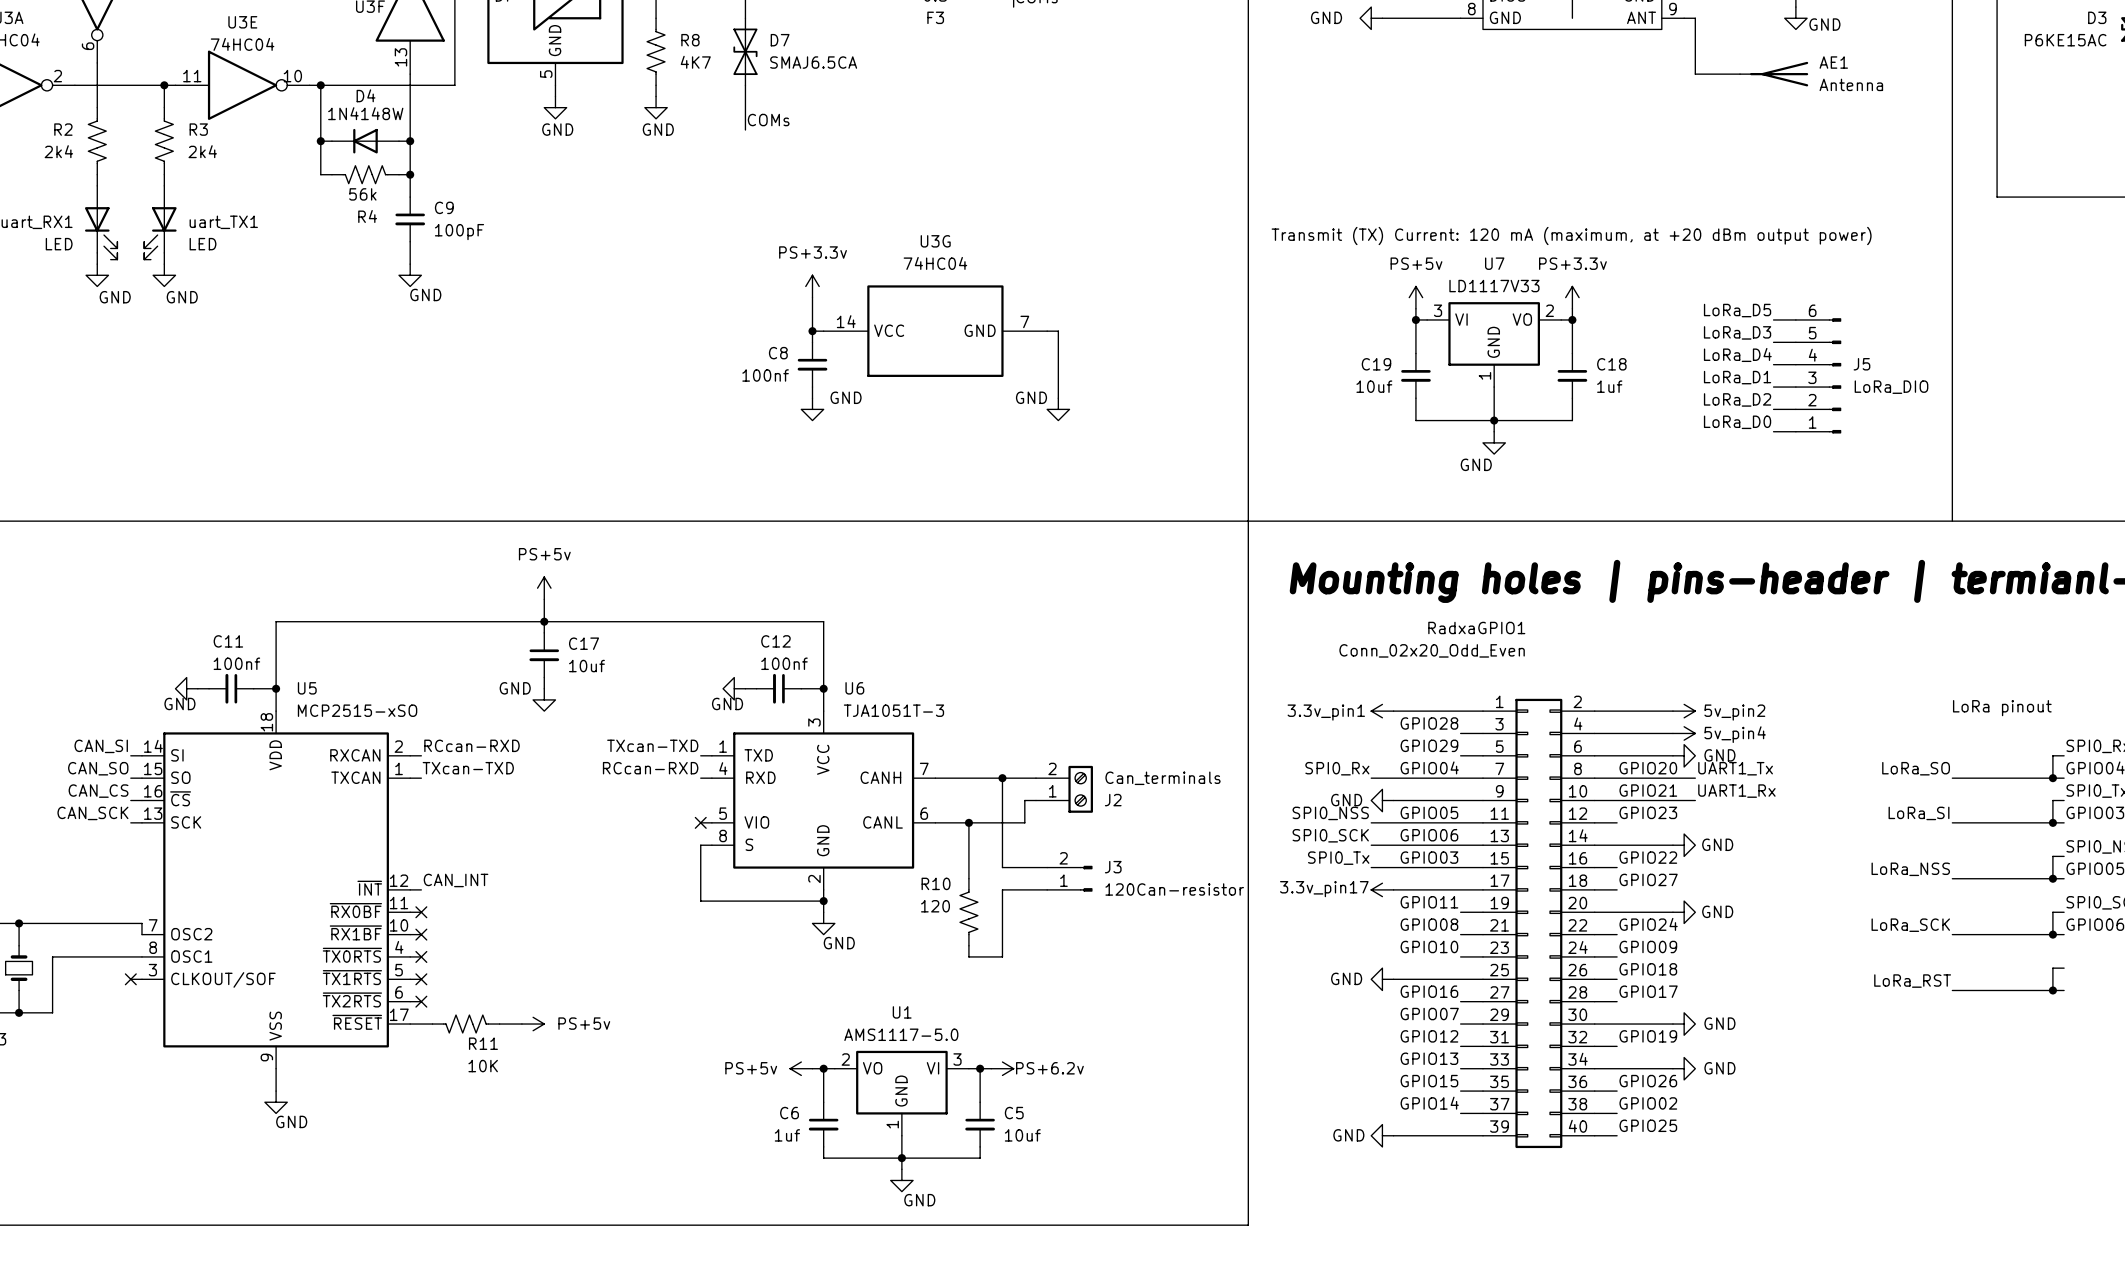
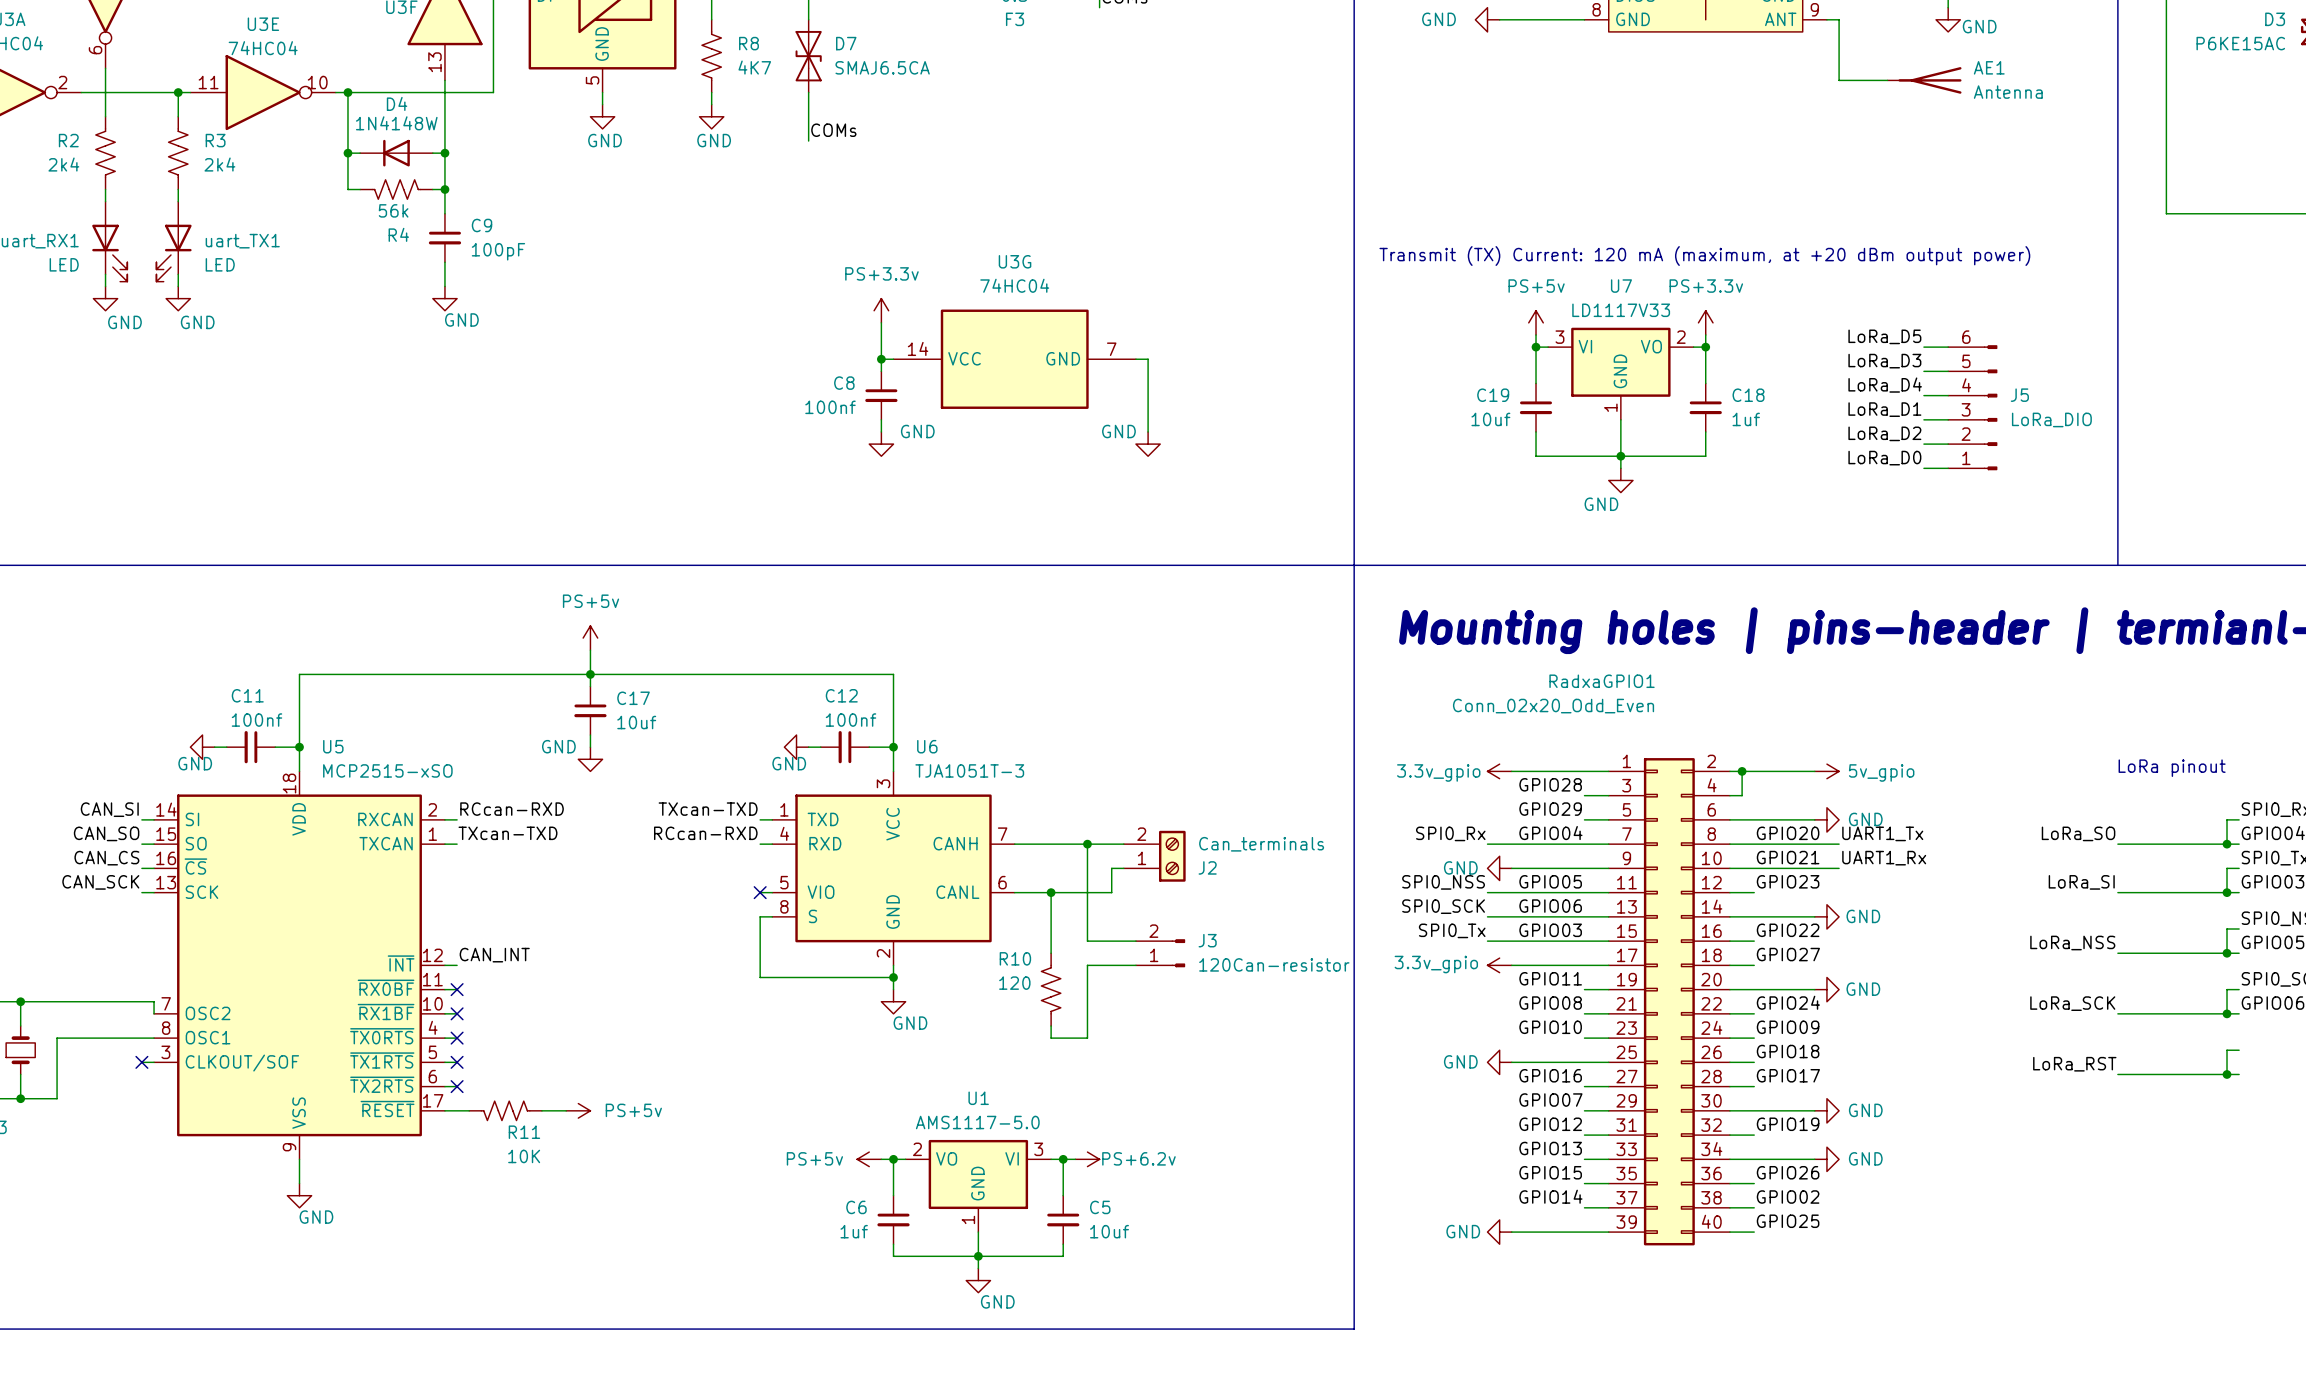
power symbol: 3.3v_pin1 (1382, 711) -> 3.3v_gpio (1499, 771)
junction: none -> (1742, 771)
power symbol: 5v_pin2 (1684, 711) -> 5v_gpio (1826, 771)
wire: (1605, 733) (1672, 733) -> (1742, 795) (1742, 771)
power symbol: 5v_pin4 (1684, 733) -> none
power symbol: 3.3v_pin17 (1382, 889) -> 3.3v_gpio (1499, 965)

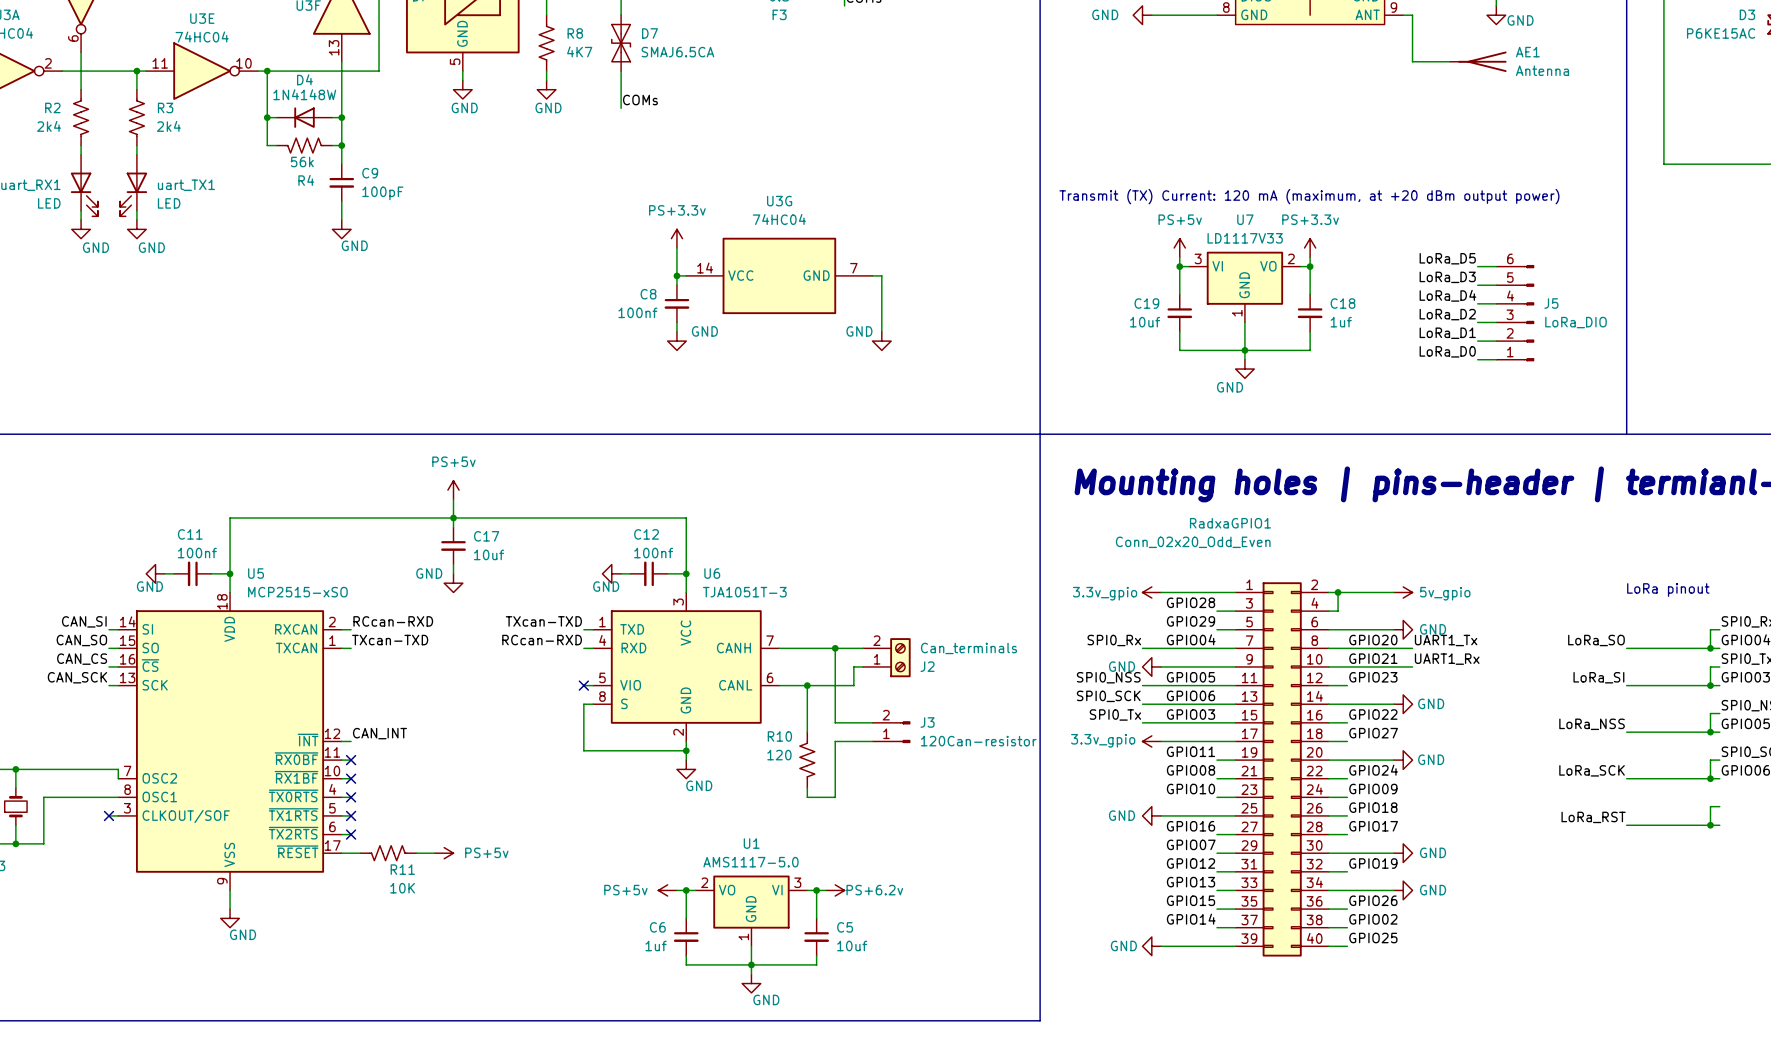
label: LoRa_D1 (1884, 409) -> LoRa_D2 (1447, 314)
label: LoRa_D2 (1884, 433) -> LoRa_D1 (1447, 333)

